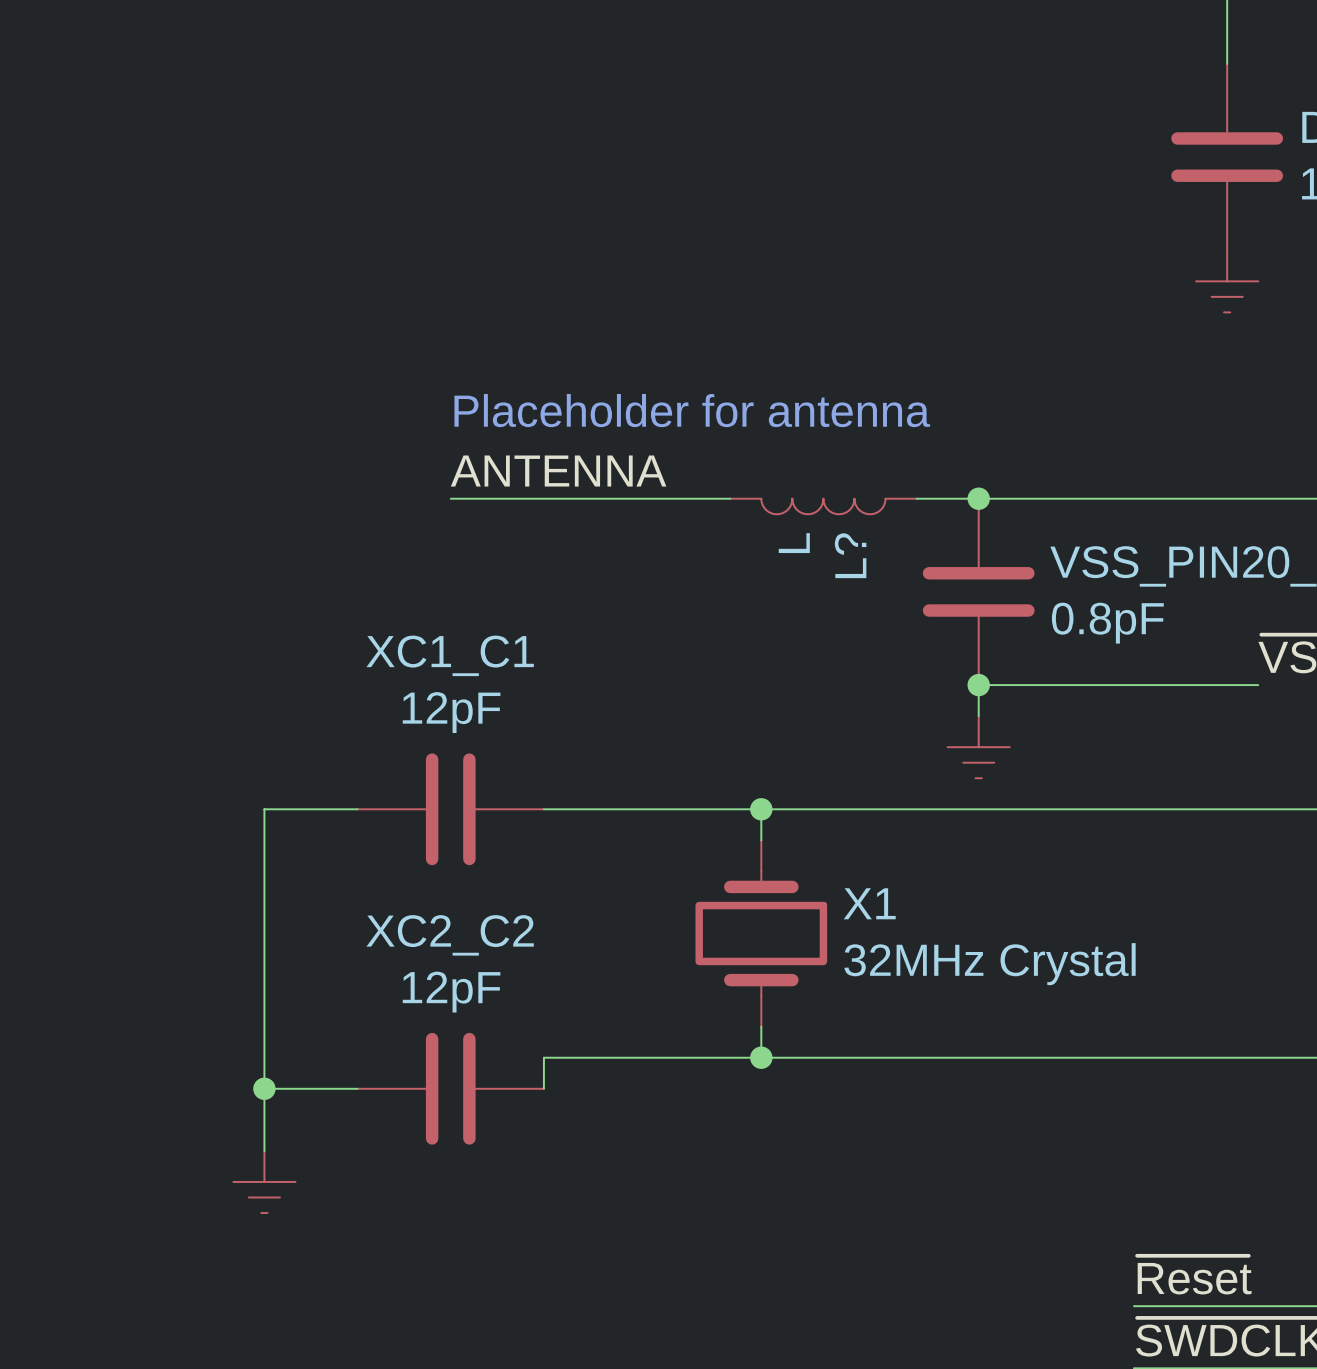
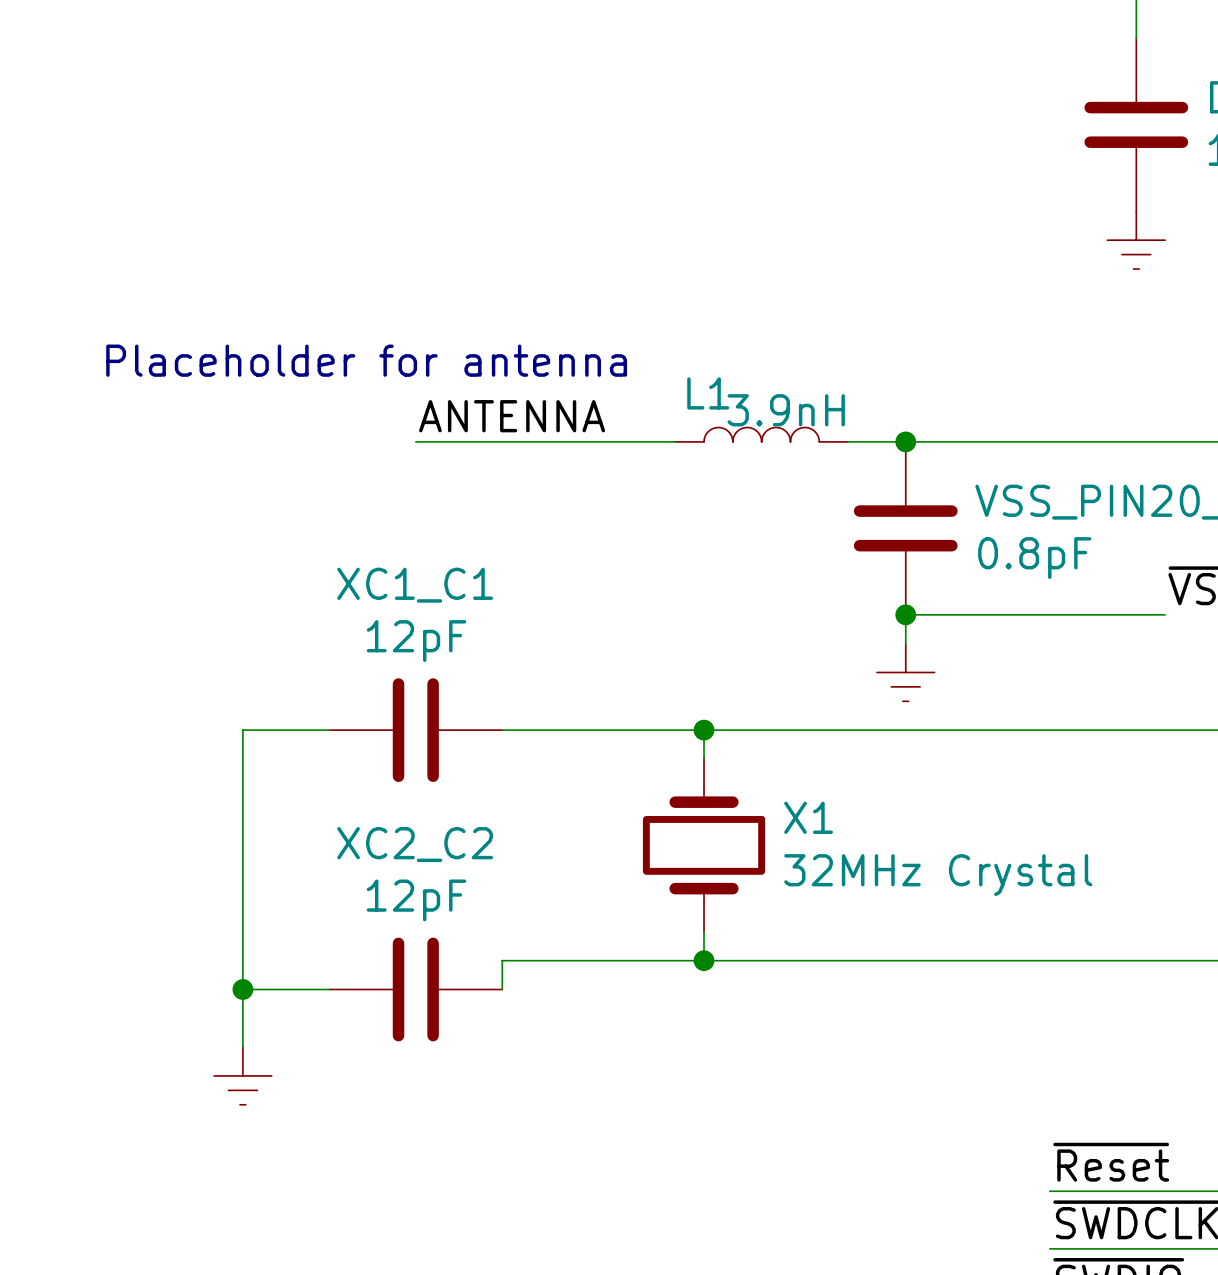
text position: Placeholder for antenna (692, 410) -> Placeholder for antenna (366, 360)
L1: none -> 3.9nH (761, 434)
L?: L (823, 506) -> none

